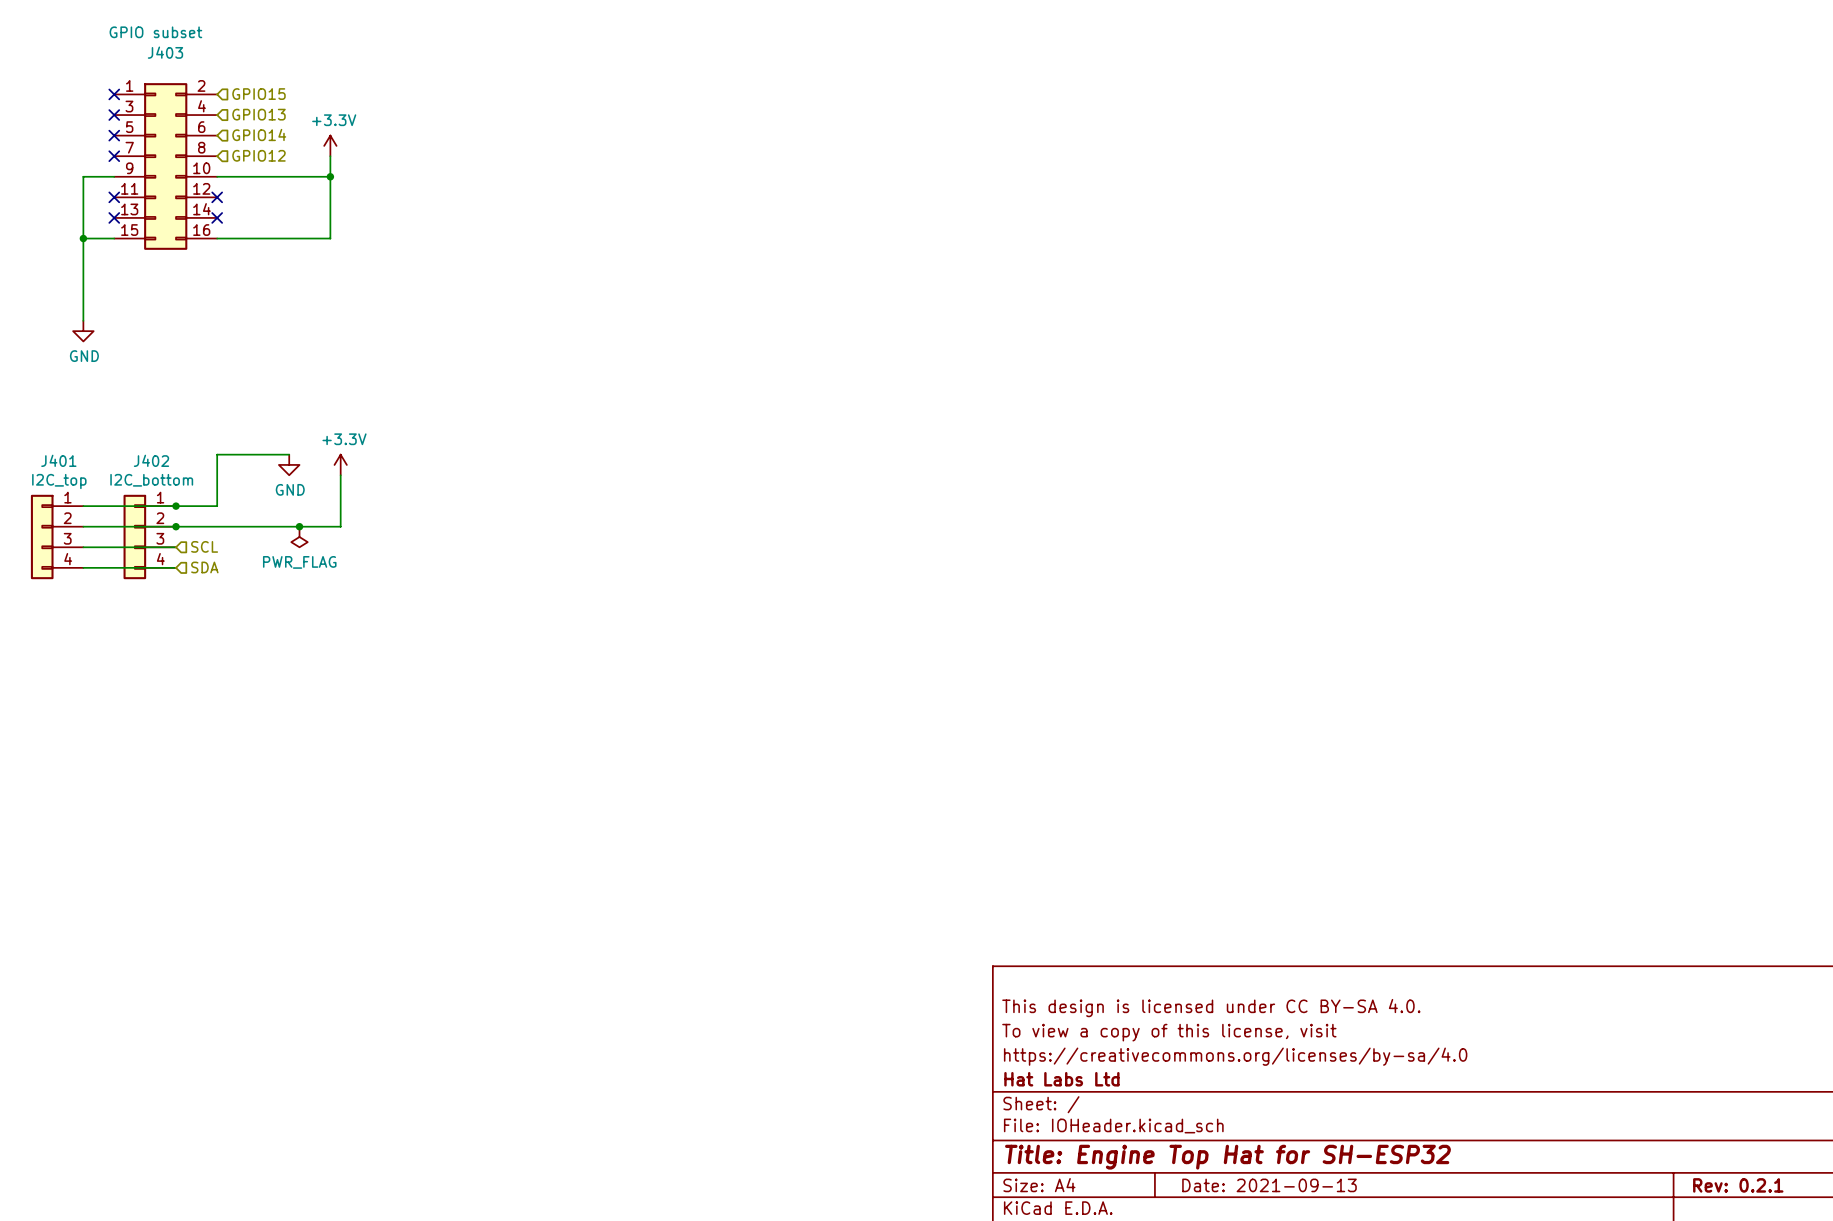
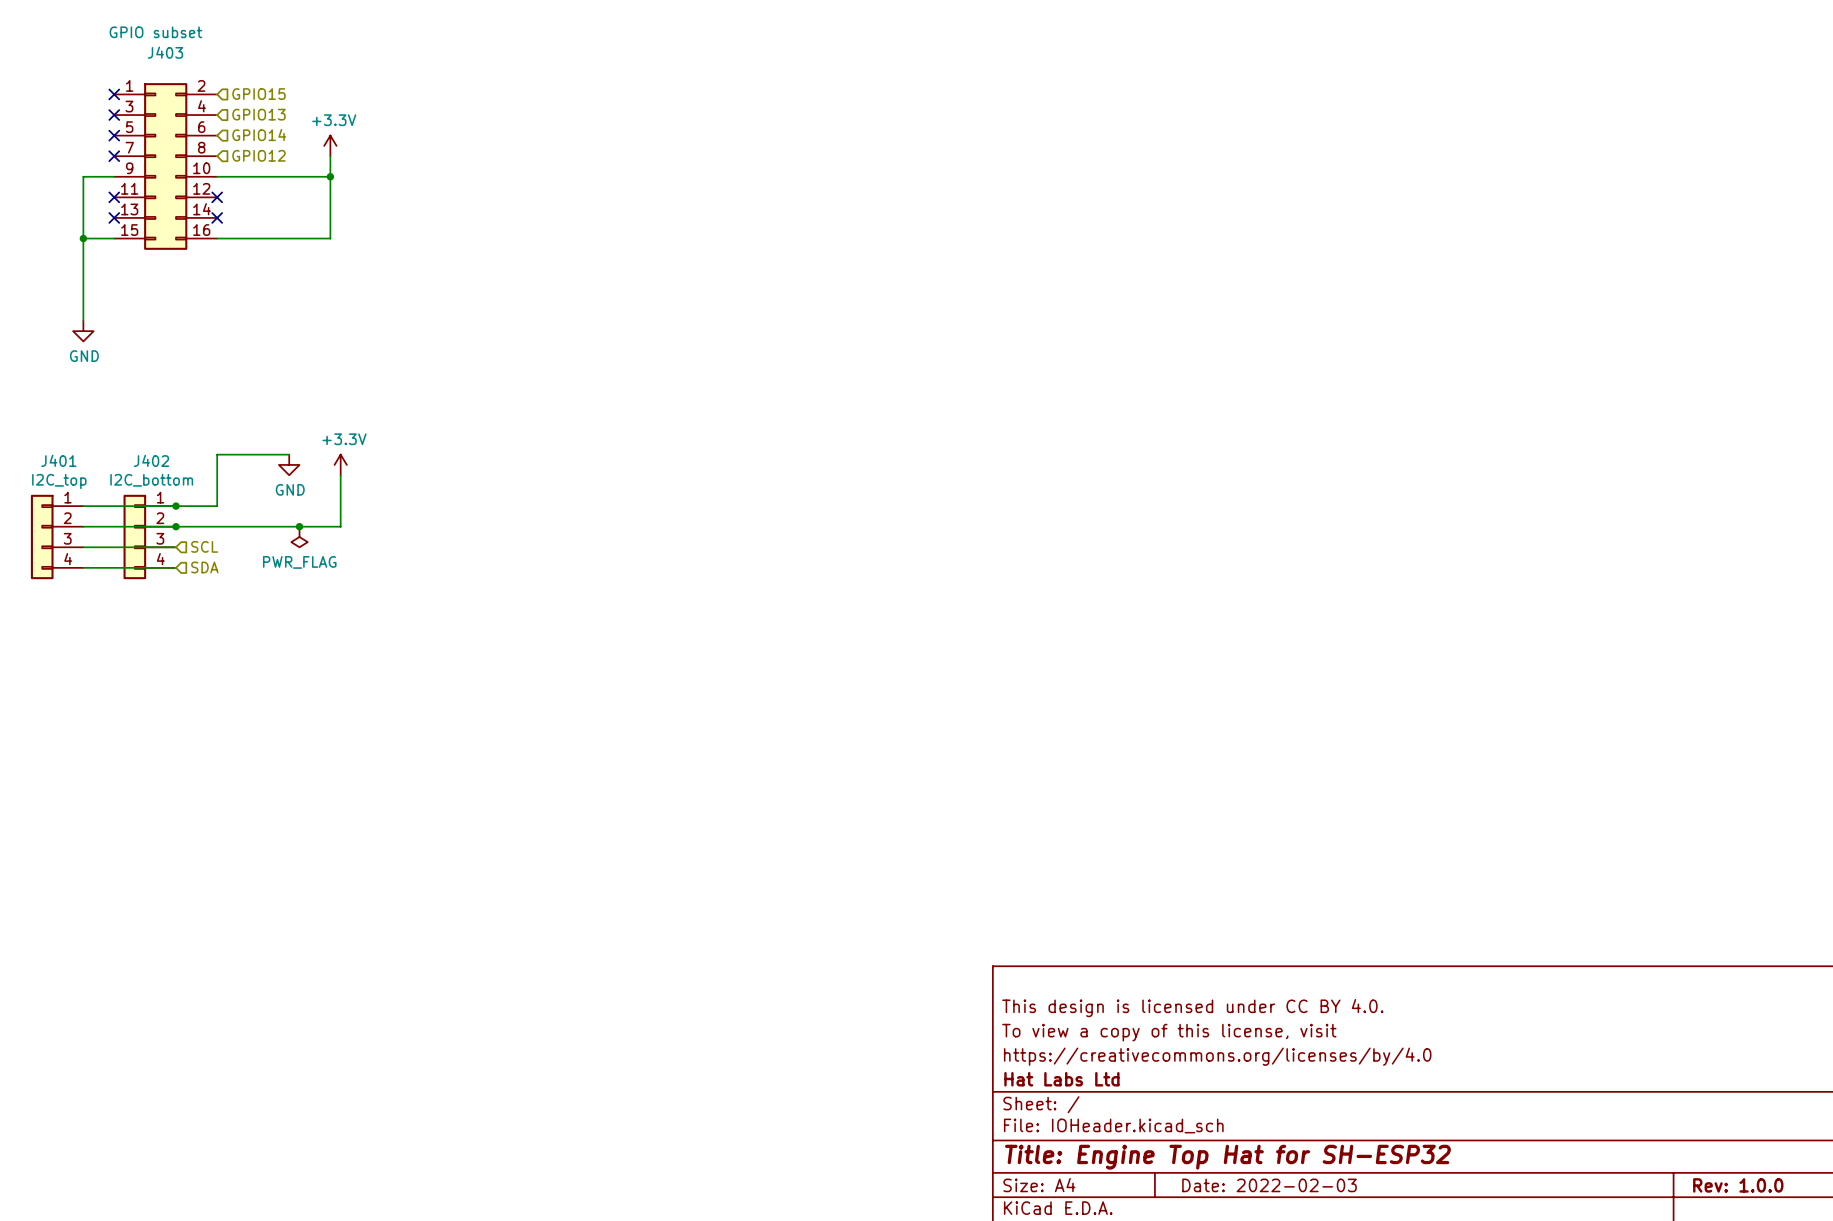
title block: This design is licensed under CC BY-SA 4.0. (1211, 1008) -> This design is licensed under CC BY 4.0. (1192, 1008)
title block: https://creativecommons.org/licenses/by-sa/4.0 (1235, 1056) -> https://creativecommons.org/licenses/by/4.0 (1217, 1056)
title block: Date: 2021-09-13 (1269, 1185) -> Date: 2022-02-03 (1269, 1185)
title block: Rev: 0.2.1 (1738, 1185) -> Rev: 1.0.0 (1738, 1185)

